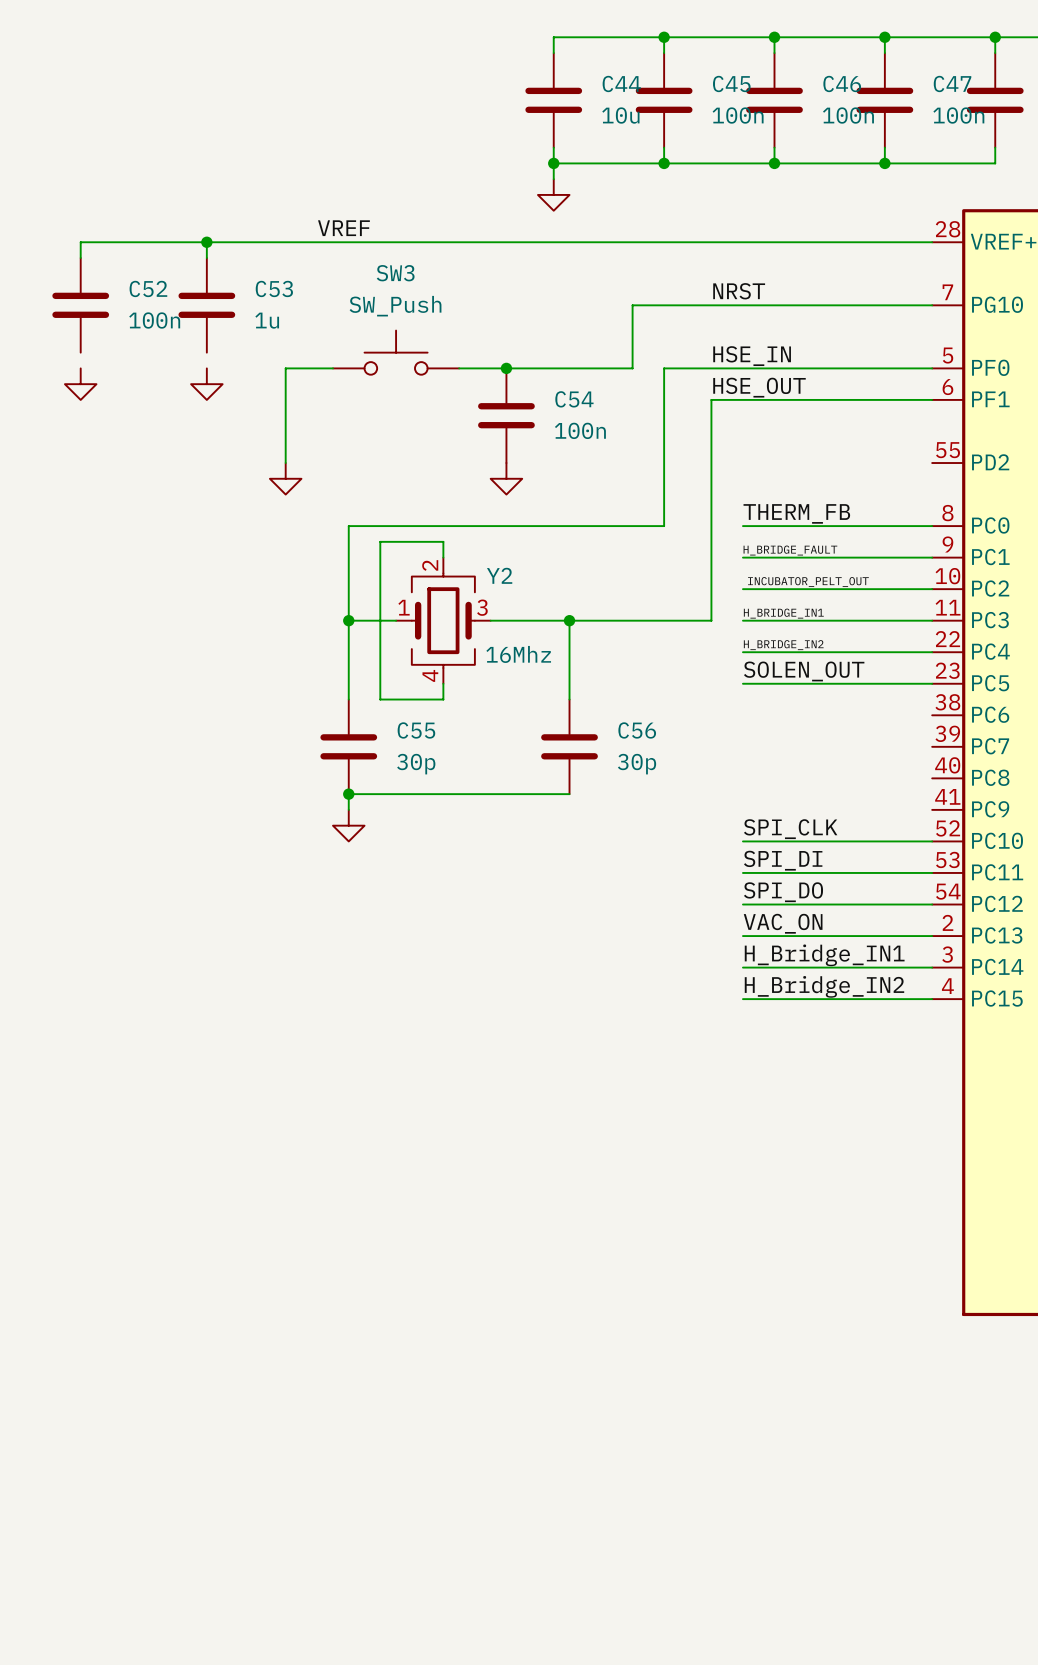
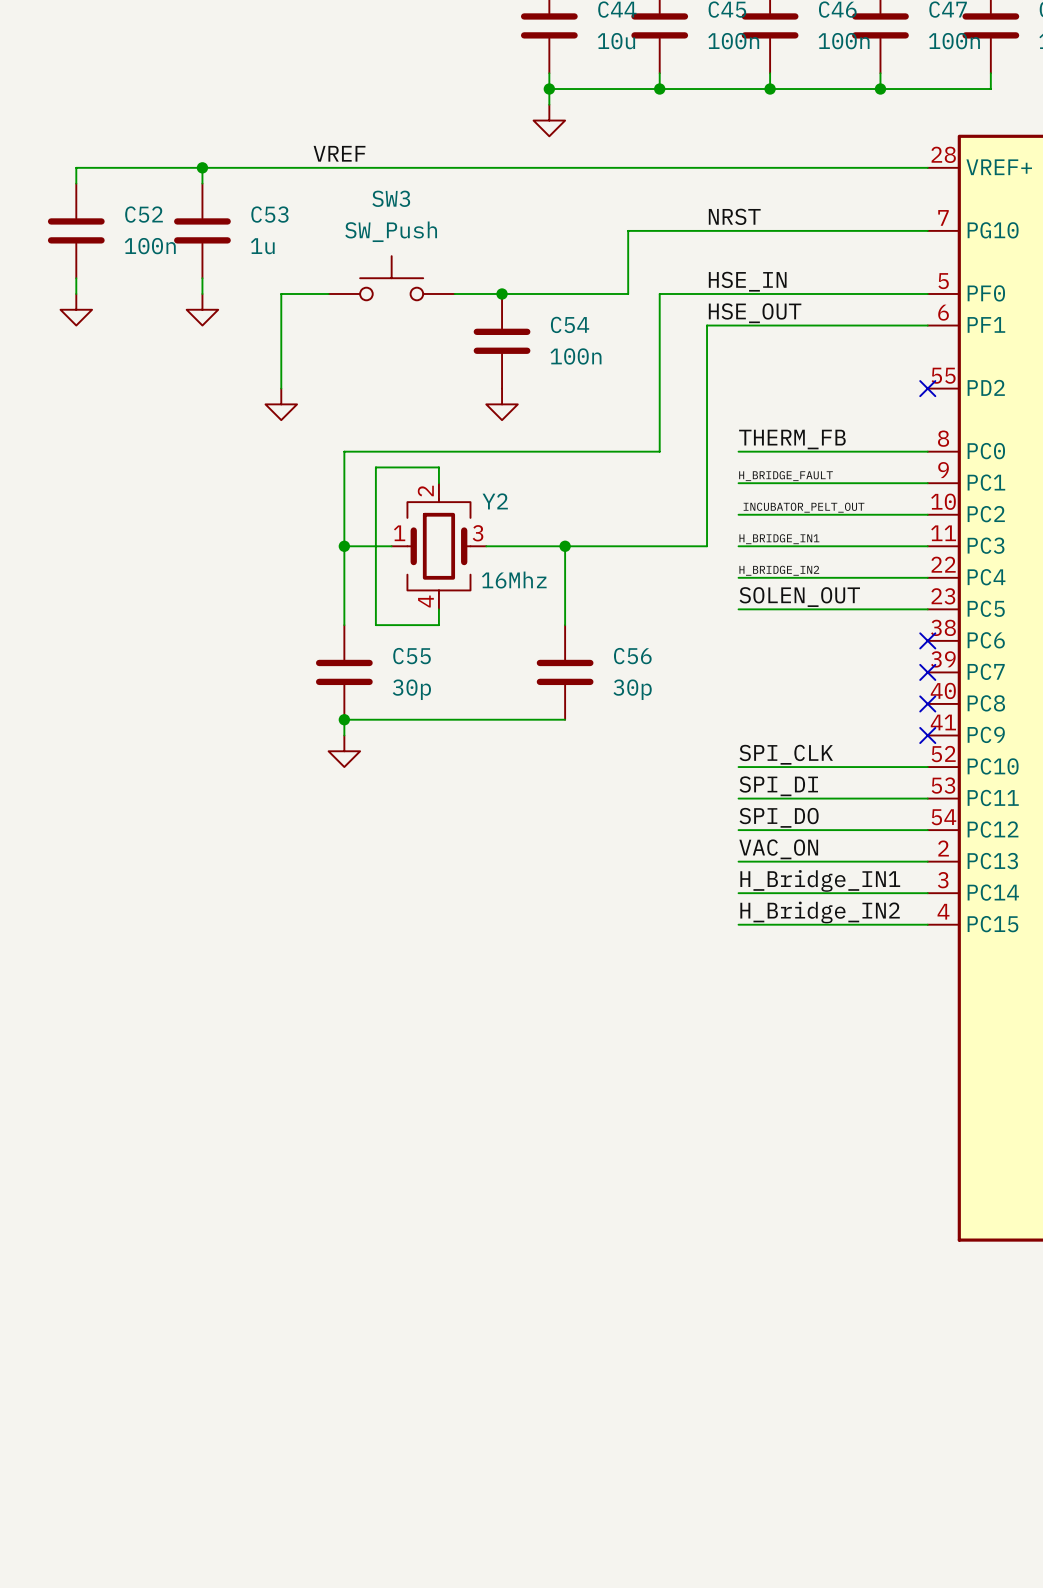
wire: none -> (76, 278) (76, 293)
wire: none -> (202, 278) (202, 293)
no-connect mark: none -> (927, 388)
no-connect mark: none -> (927, 640)
no-connect mark: none -> (927, 672)
no-connect mark: none -> (927, 703)
no-connect mark: none -> (927, 735)

